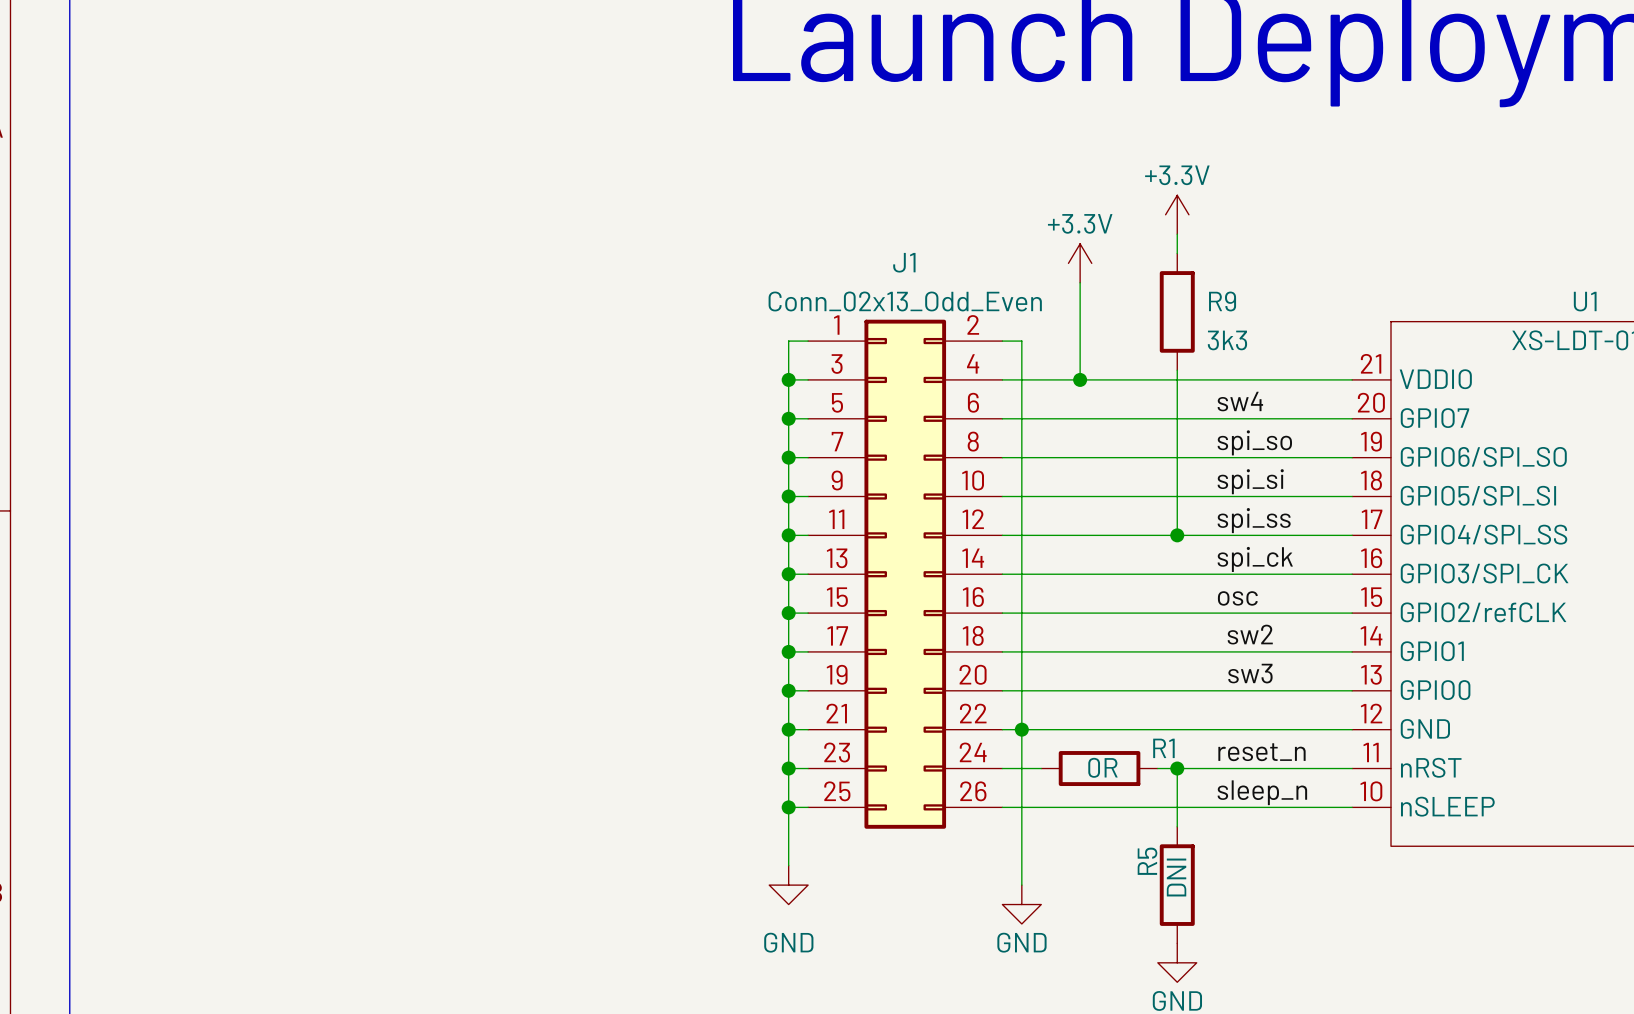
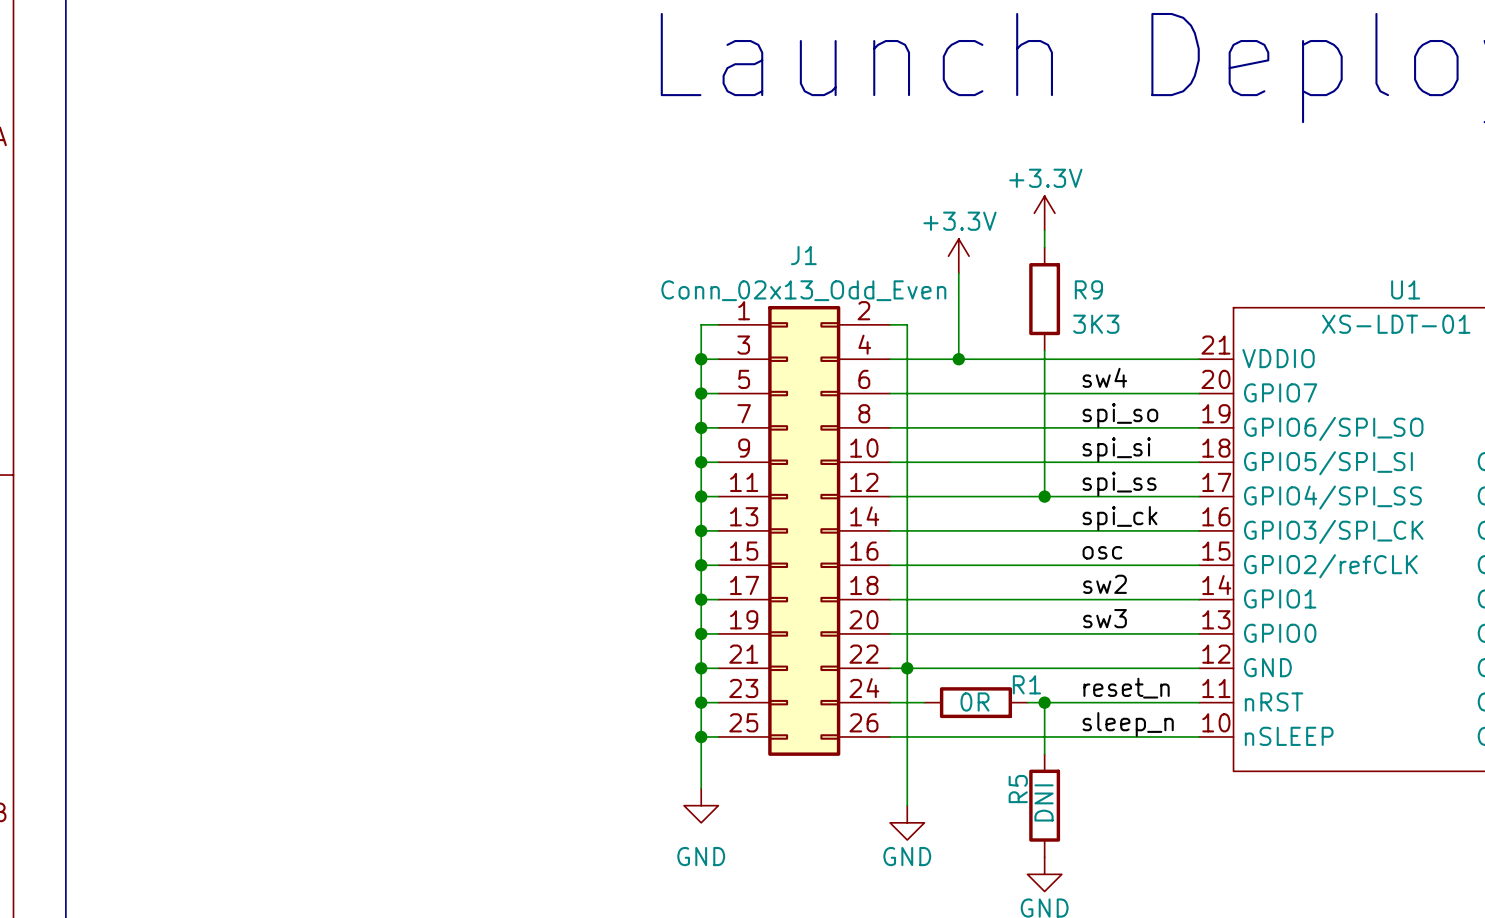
R9 value: 3k3 (1227, 340) -> 3K3 (1096, 324)

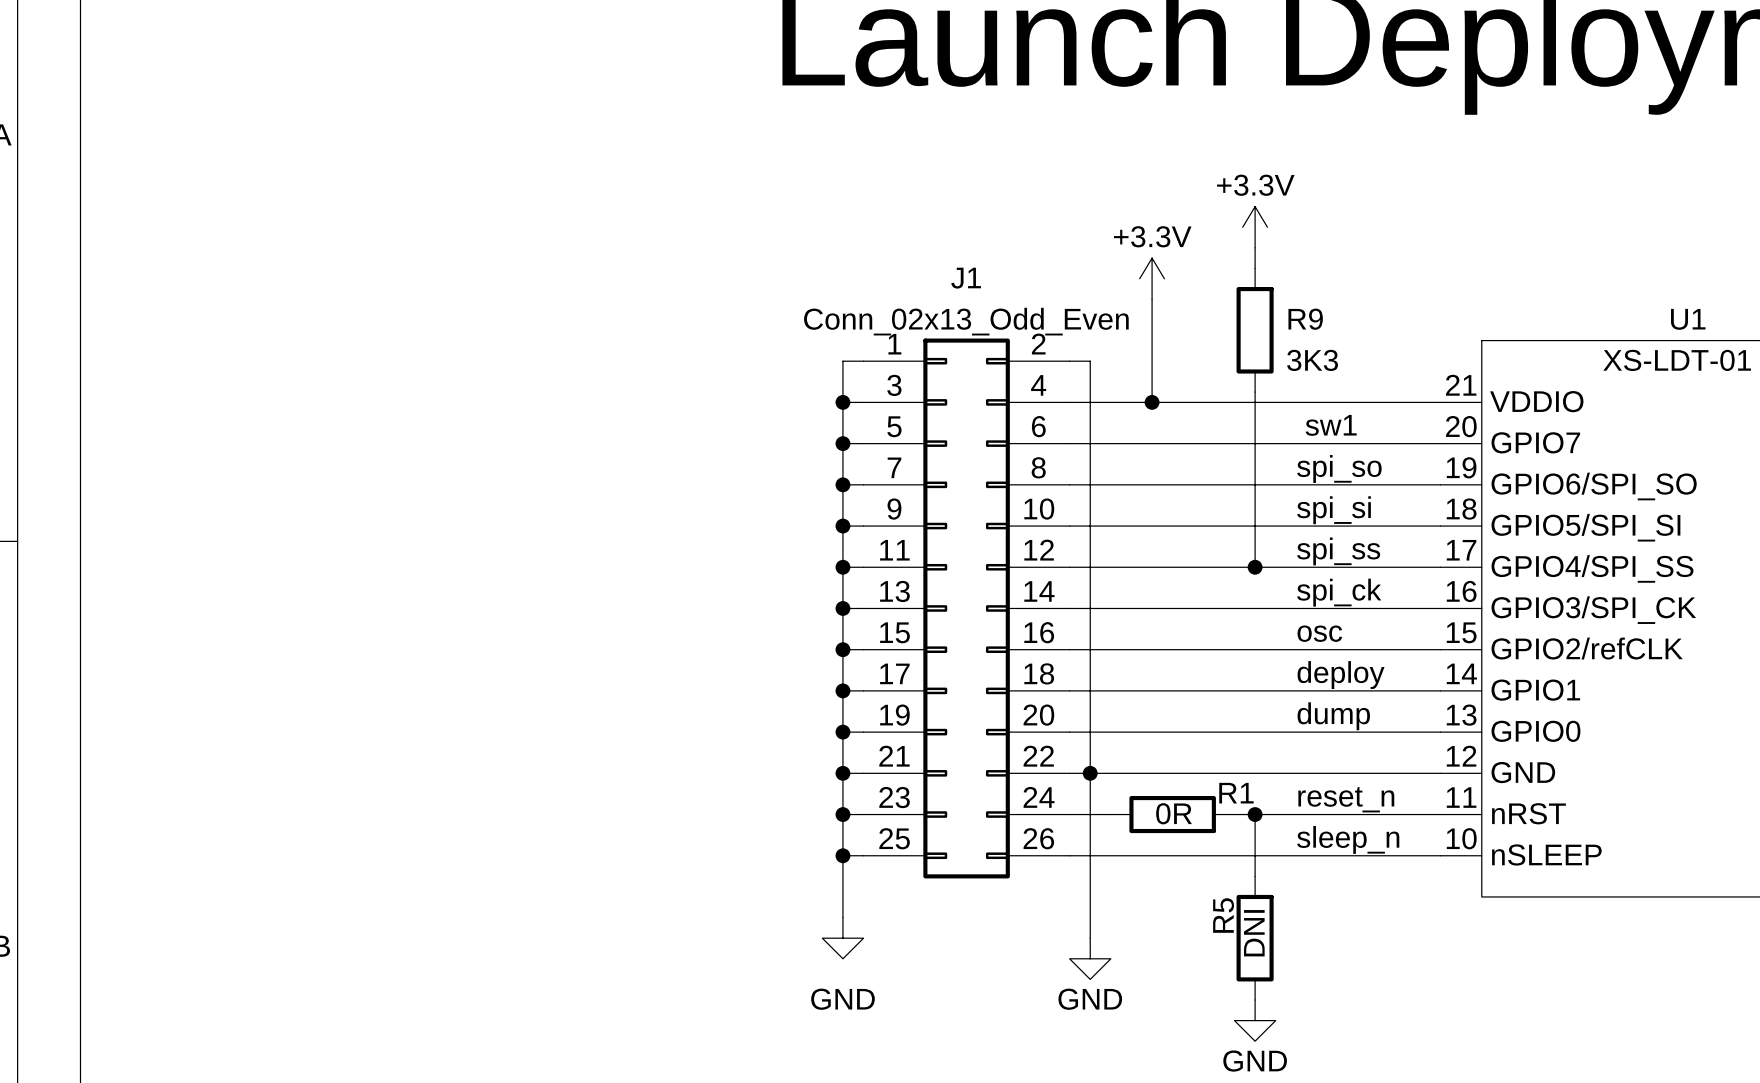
label: sw4 (1104, 377) -> sw1 (1331, 425)
label: sw2 (1105, 584) -> none
label: none -> deploy (1341, 675)
label: sw3 (1105, 618) -> none
label: none -> dump (1333, 716)

